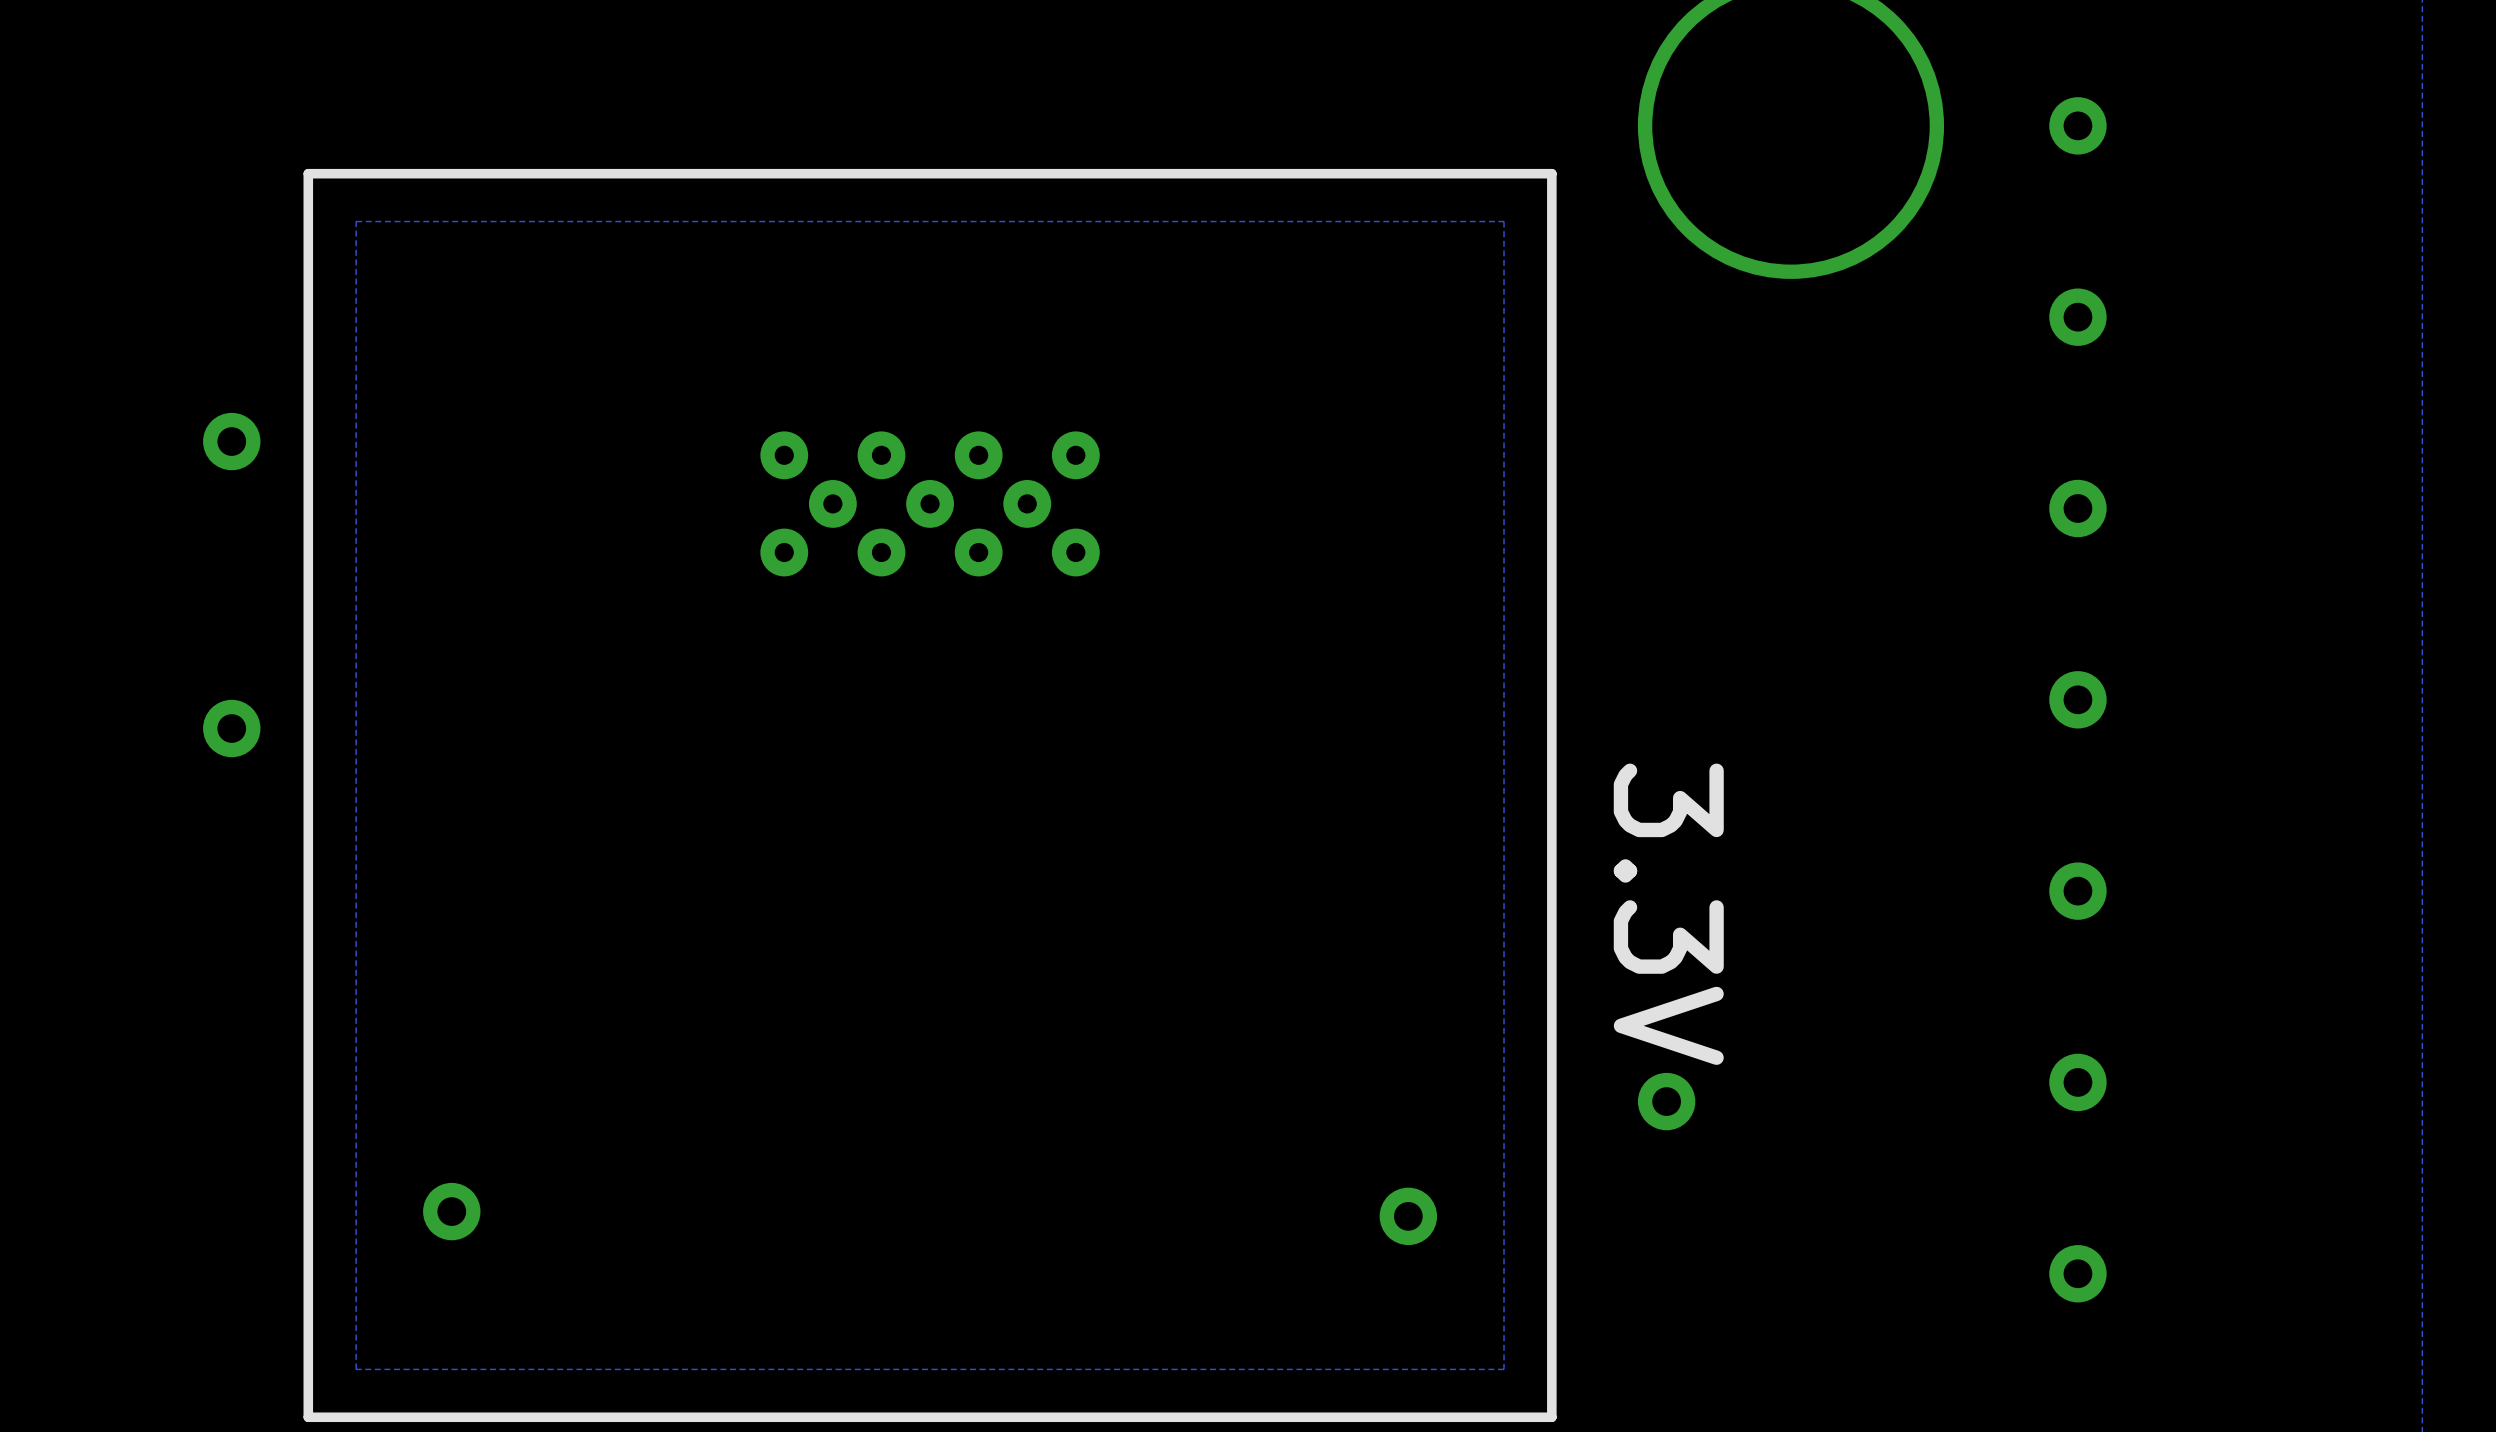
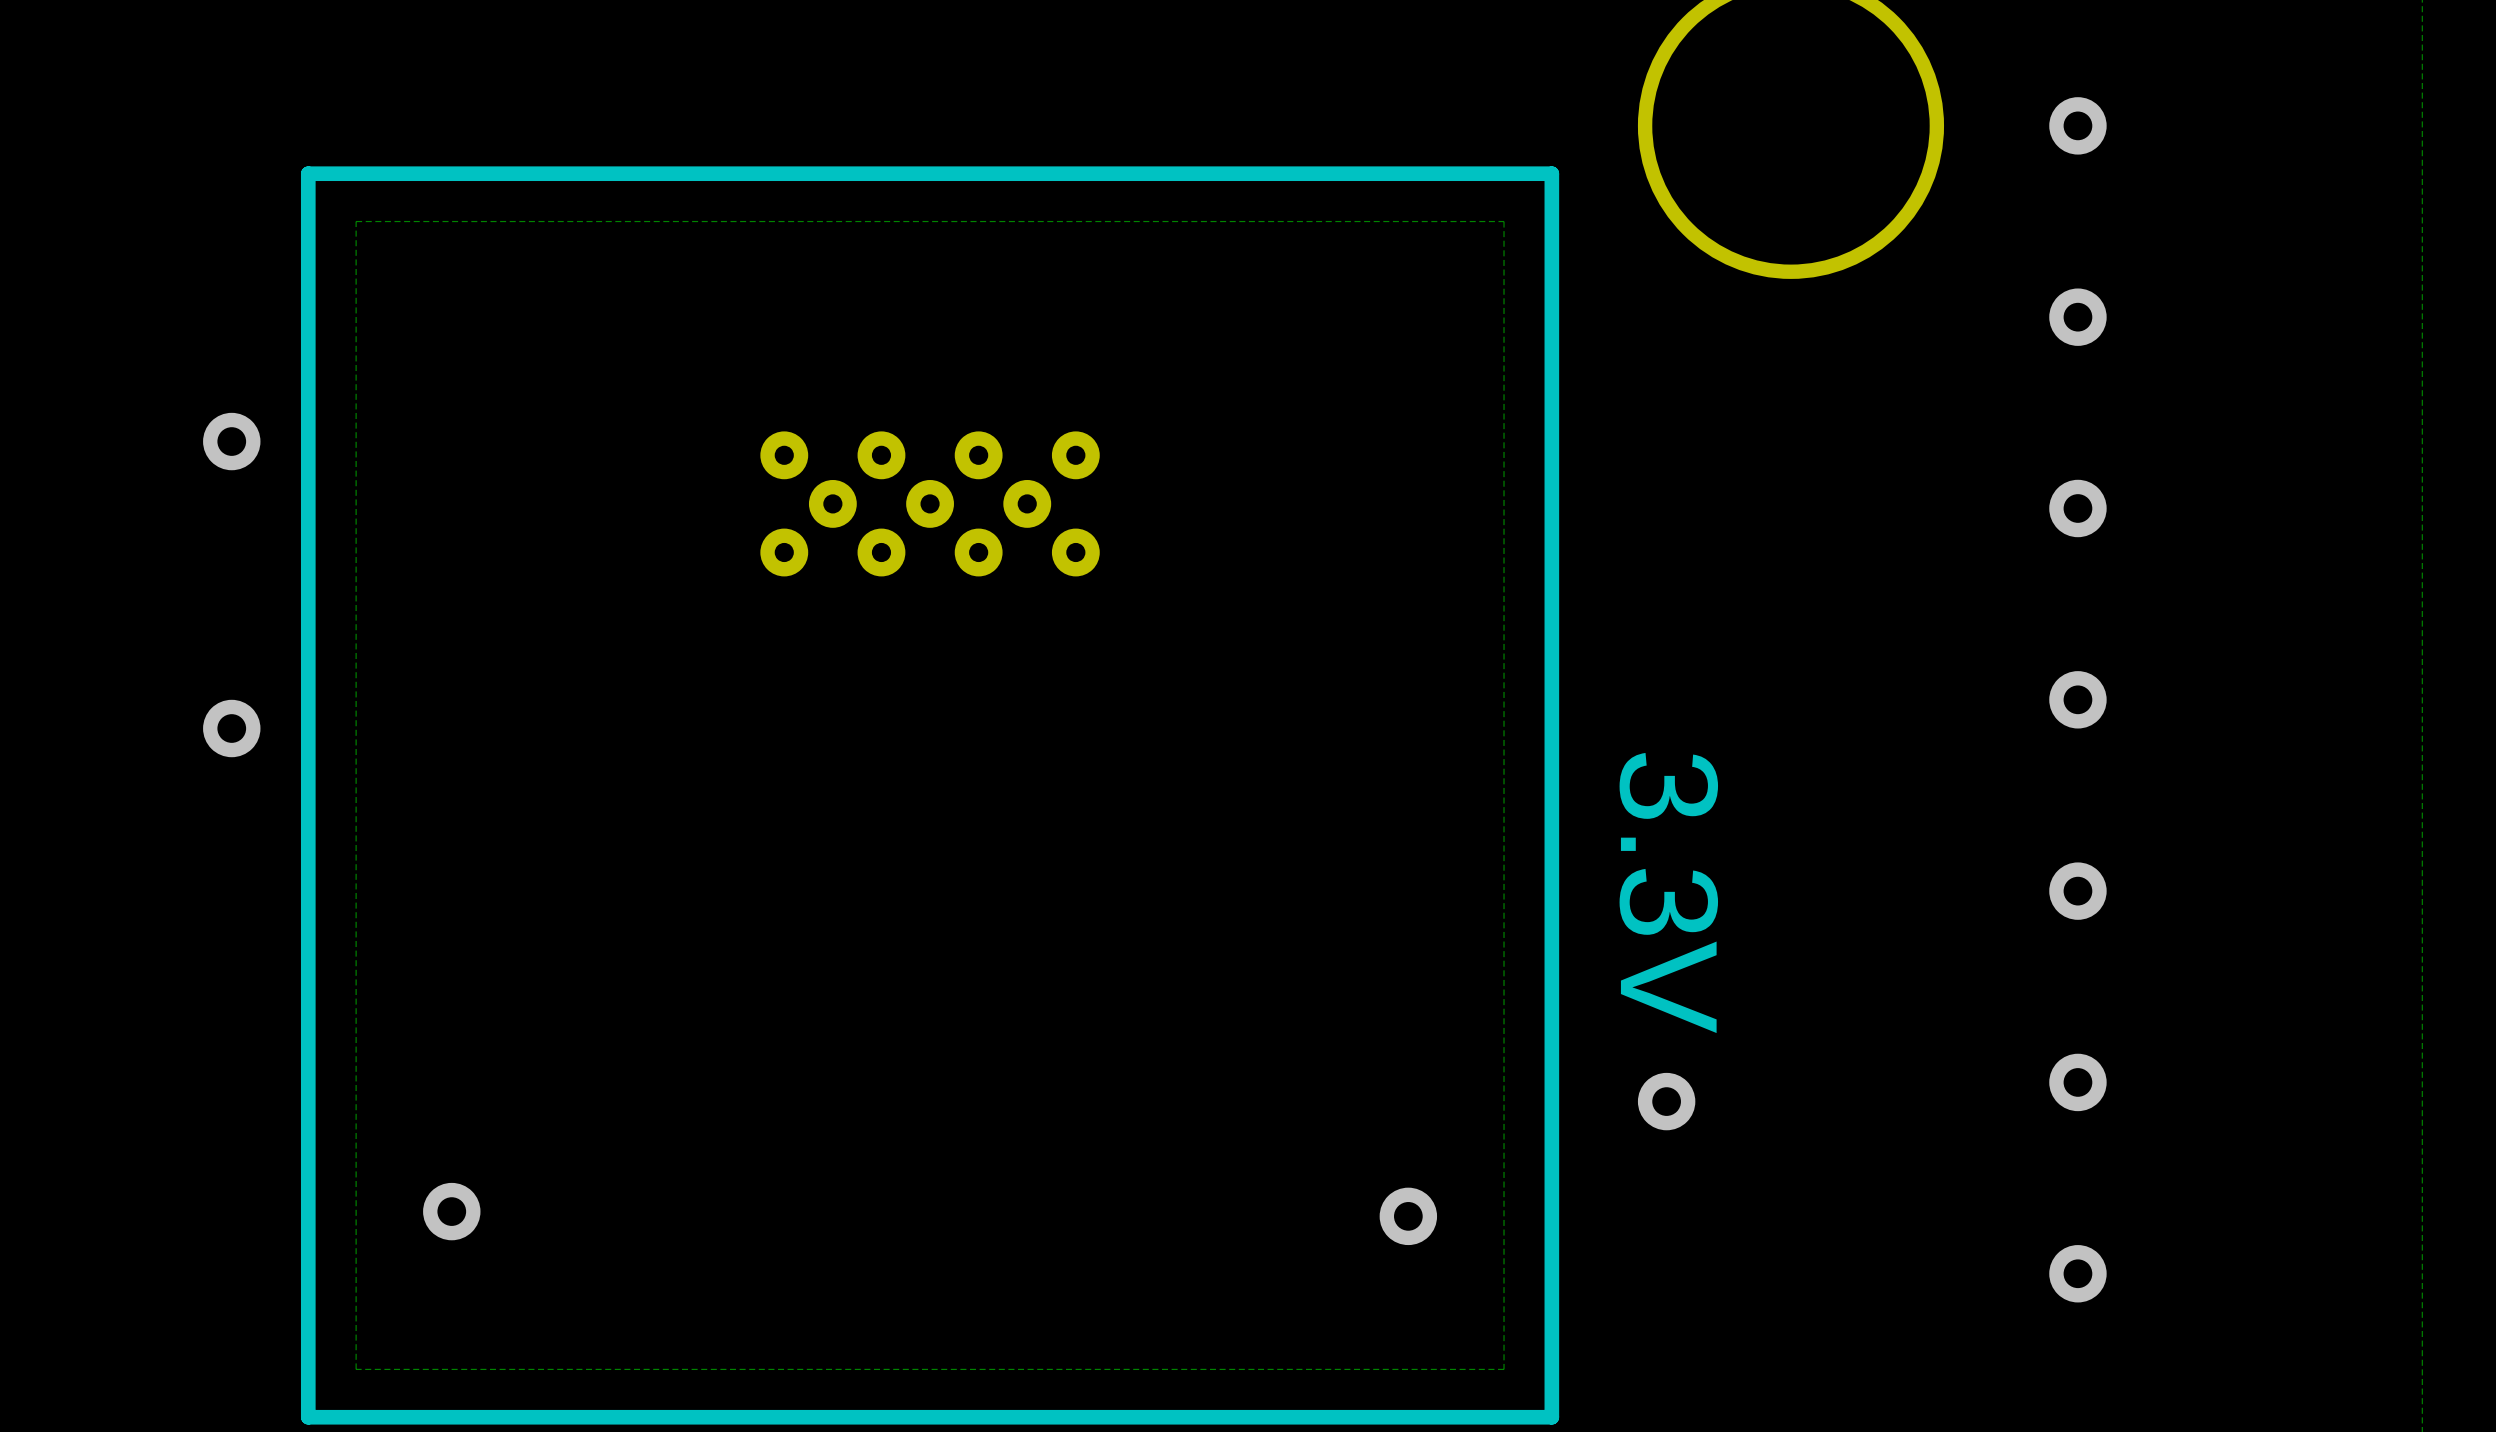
line width: thin (1551, 173) (308, 173) (308, 1417) (1551, 1417) (1551, 173) -> thick (1551, 173) (308, 173) (308, 1417) (1551, 1417) (1551, 173)

